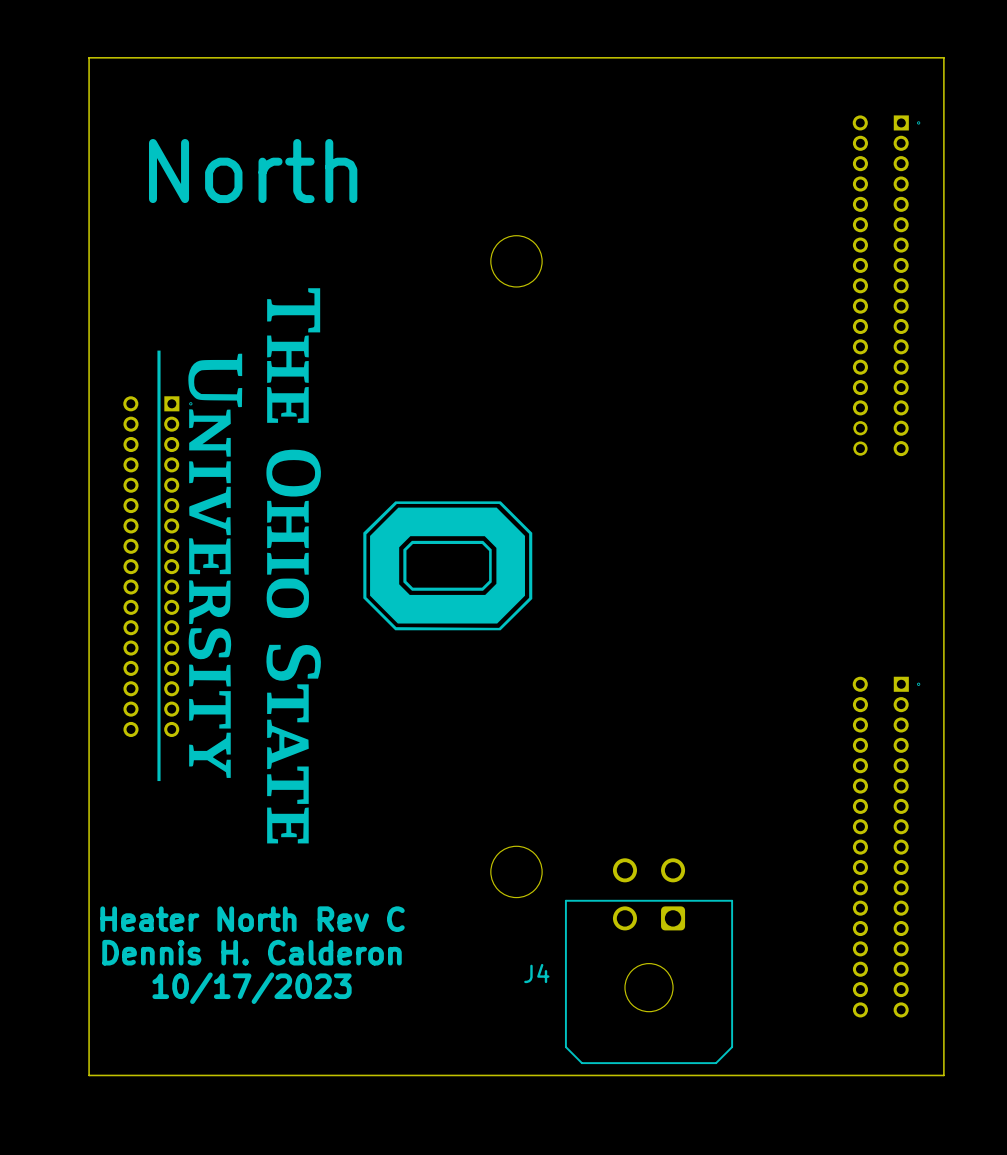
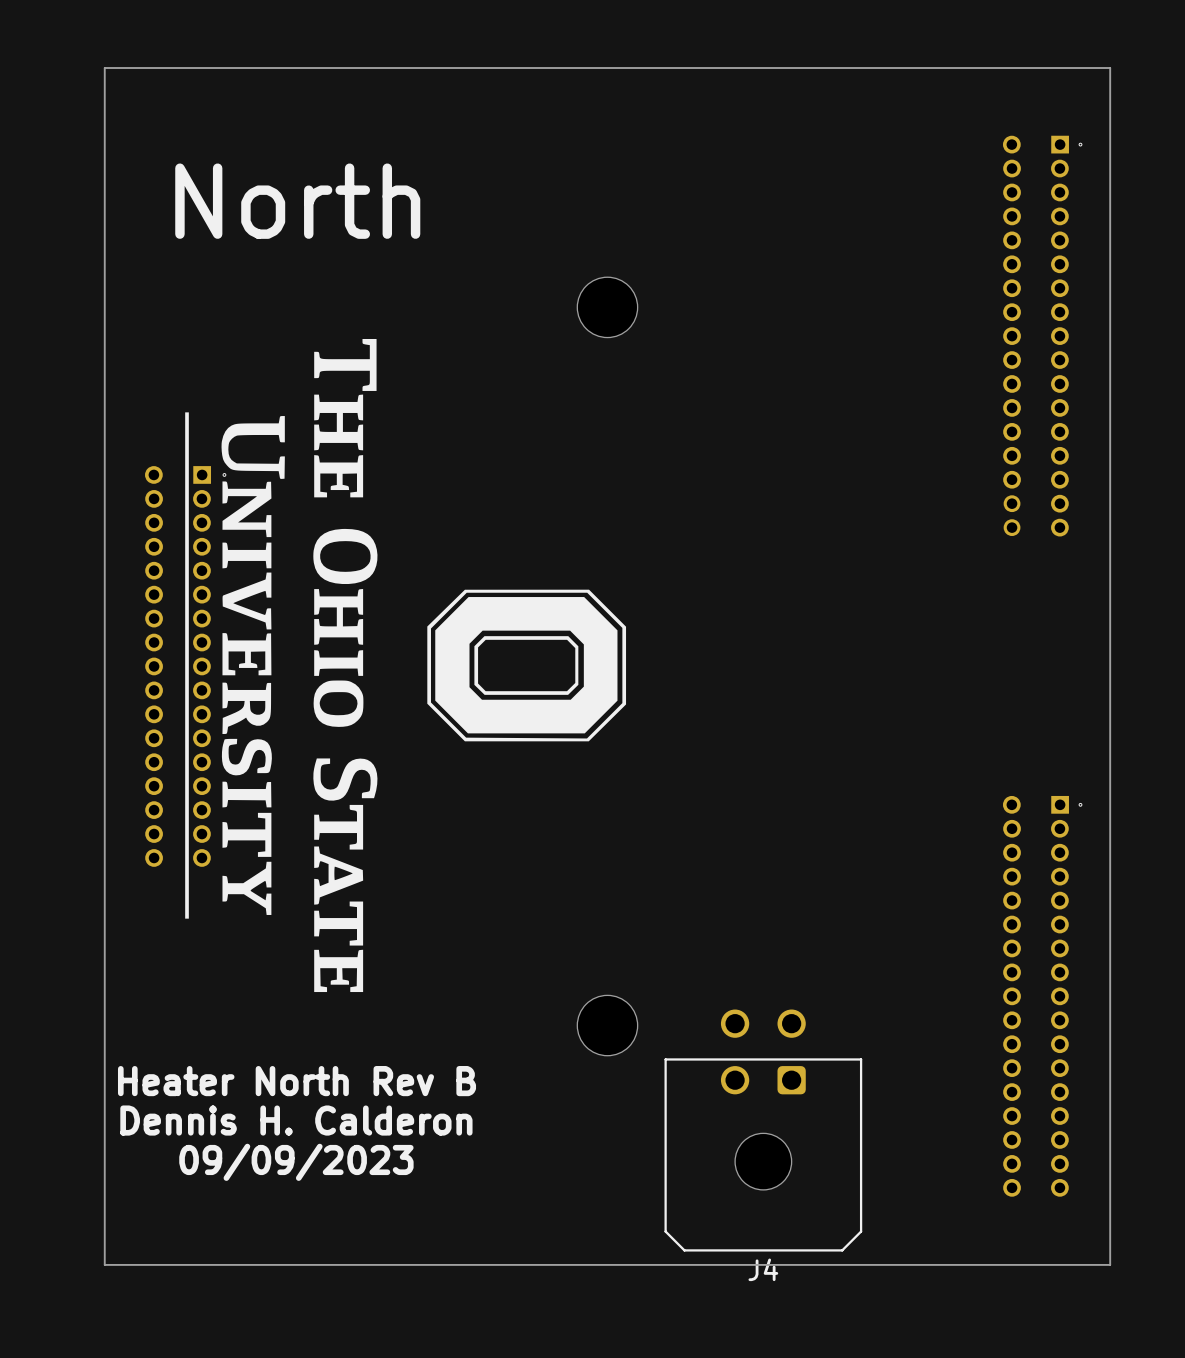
text: Heater North Rev C (252, 919) -> Heater North Rev B (297, 1081)
J4 name position: J4 (536, 973) -> J4 (763, 1269)
text: 10/17/2023 (252, 988) -> 09/09/2023 (296, 1162)

